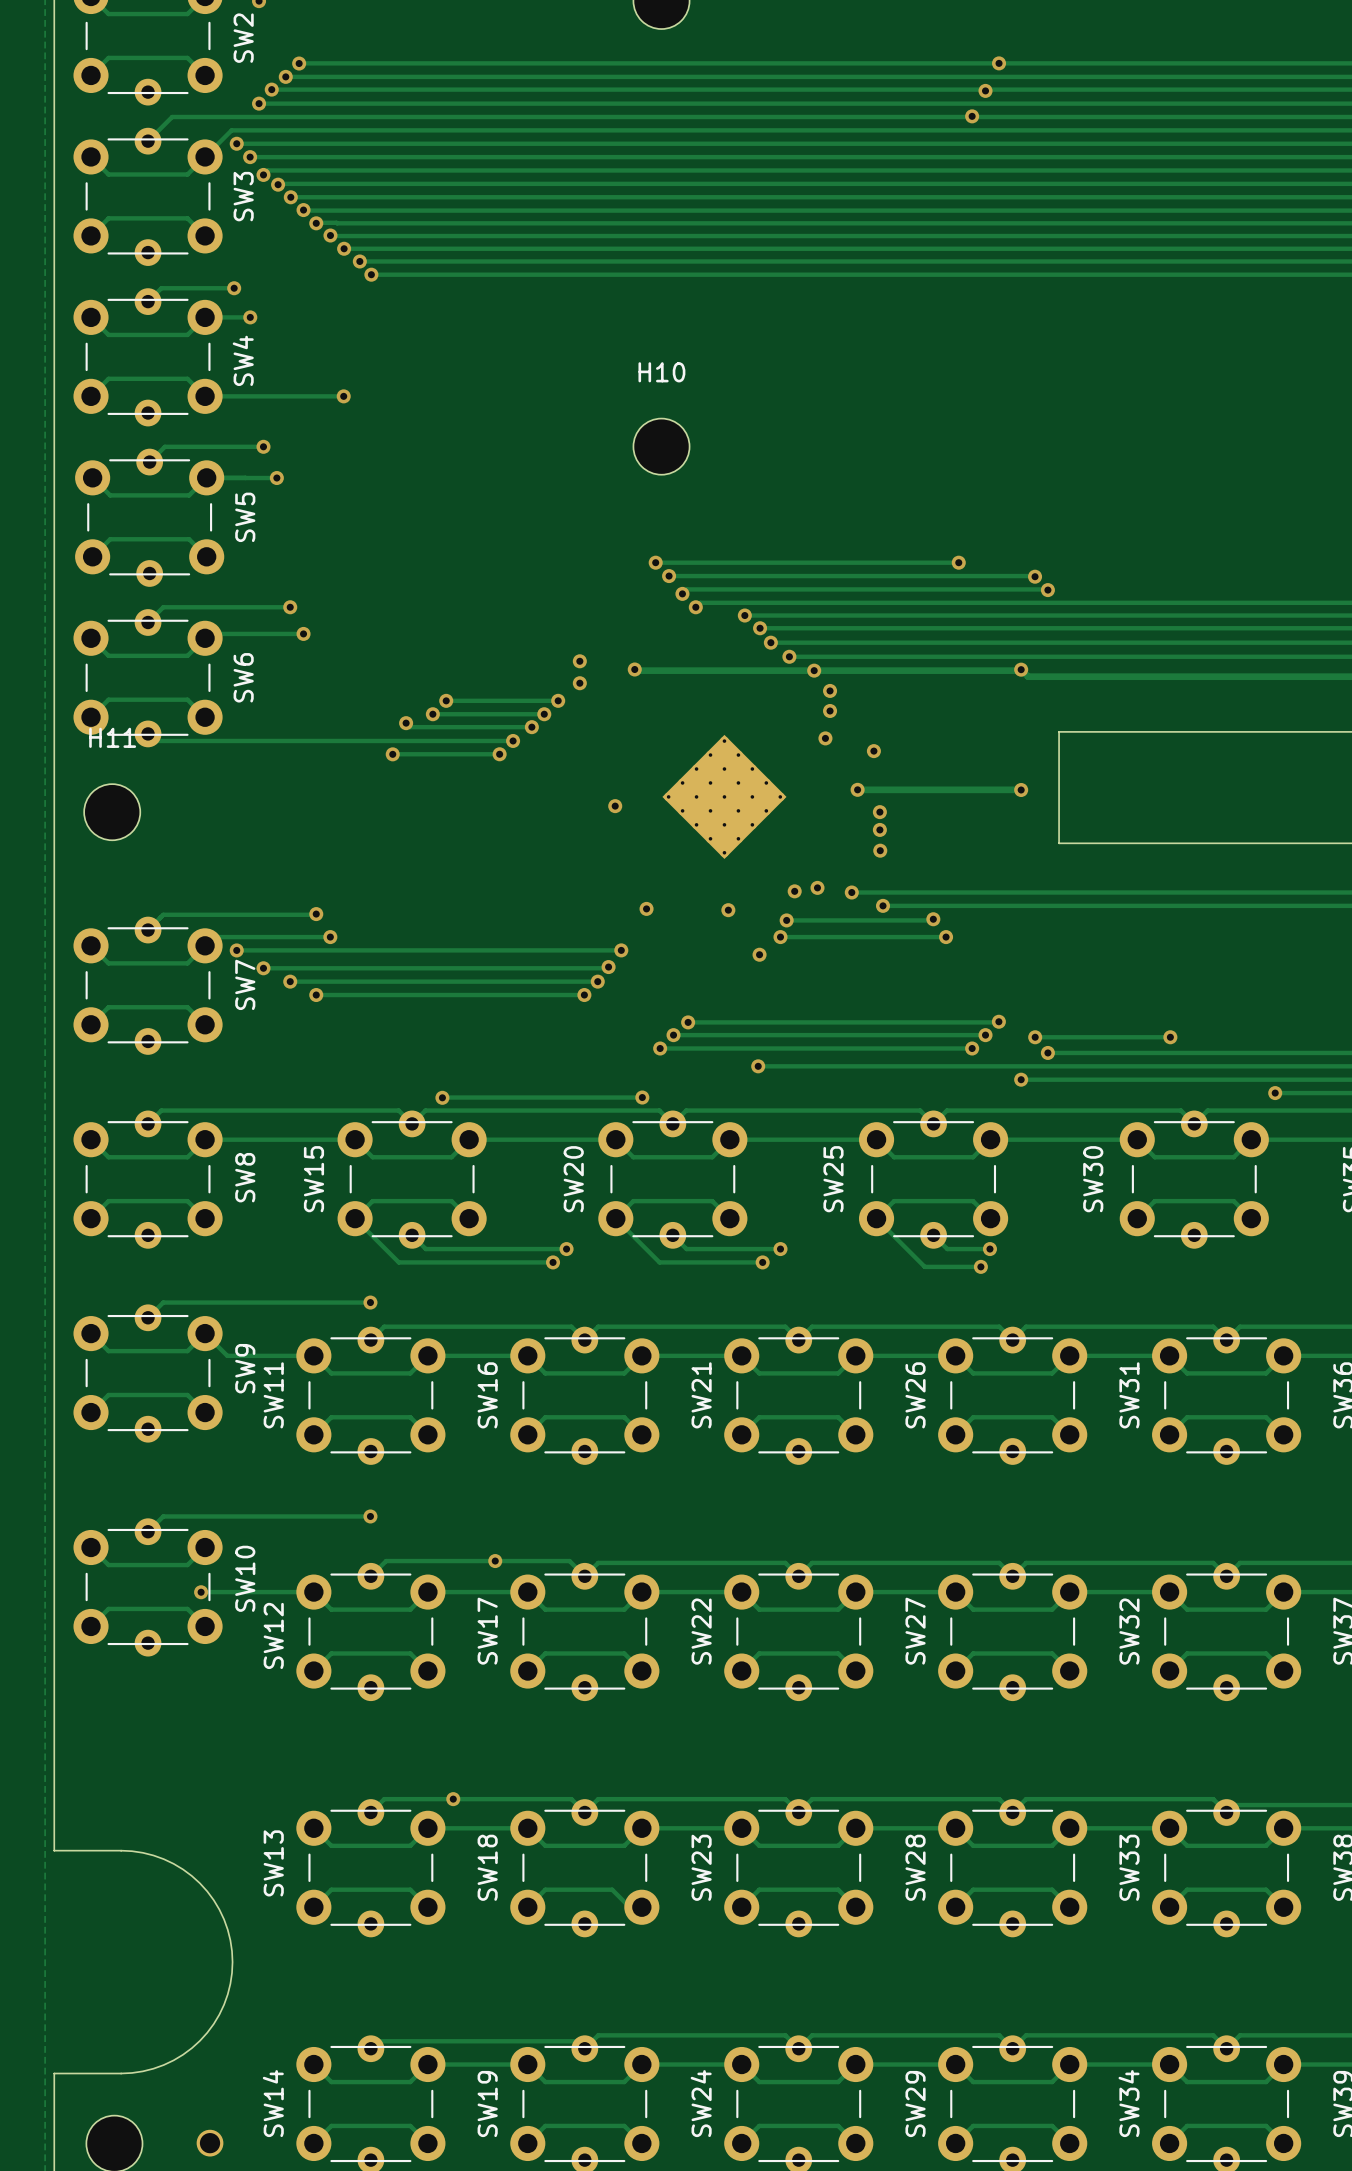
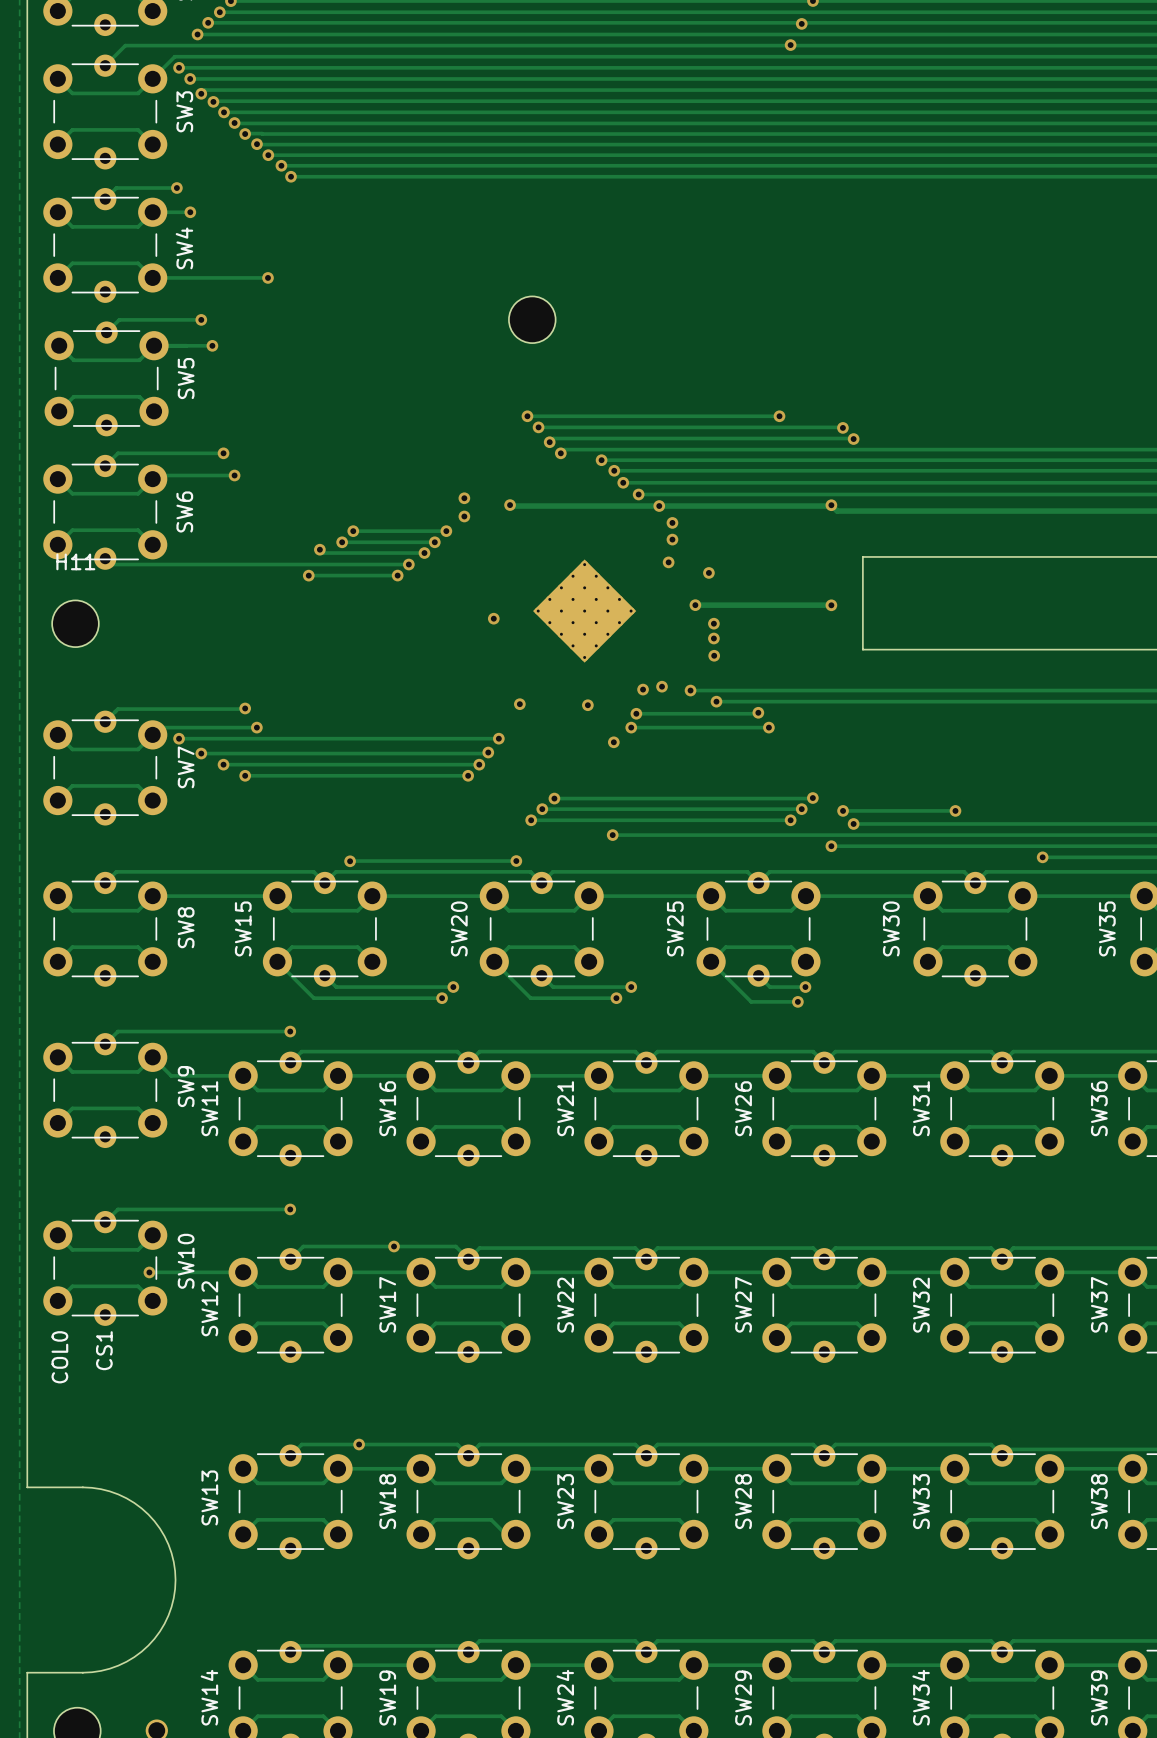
H10 name: H10 (661, 372) -> none
text: none -> CS1 (104, 1350)
text: none -> COL0 (59, 1357)

